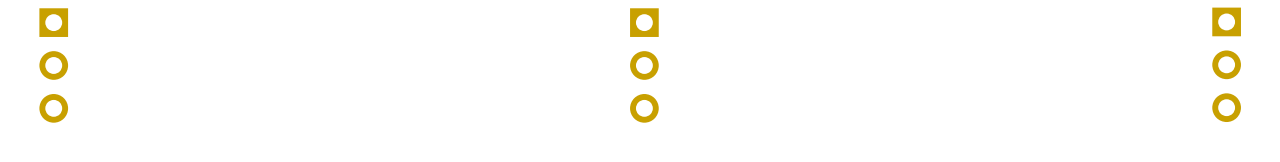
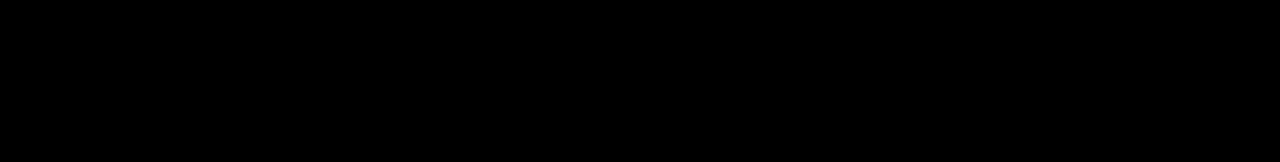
part: (1226, 64) -> none
part: (53, 65) -> none
part: (644, 65) -> none

